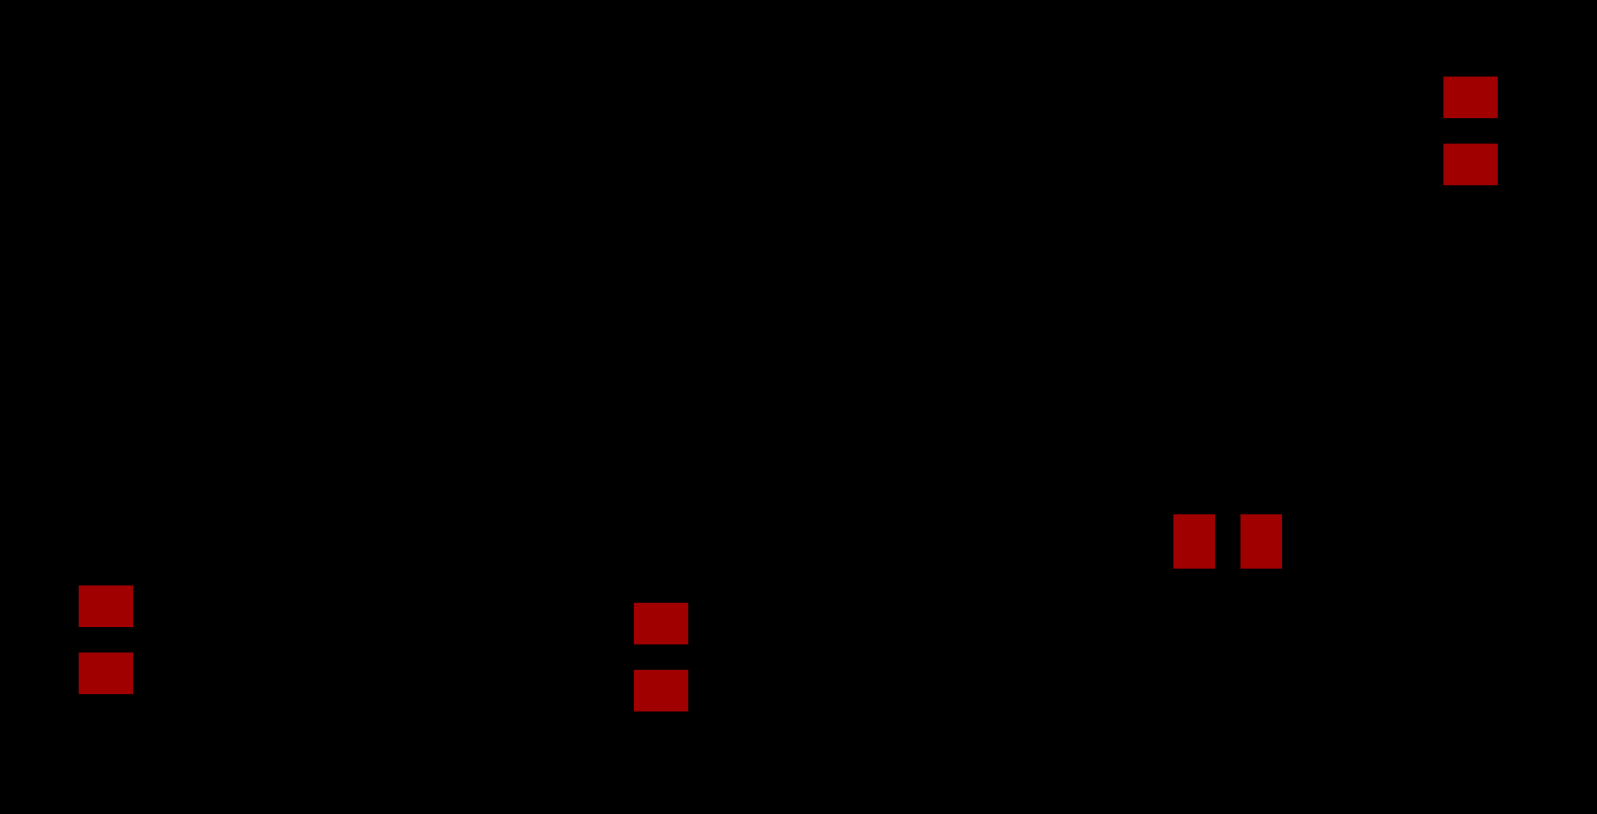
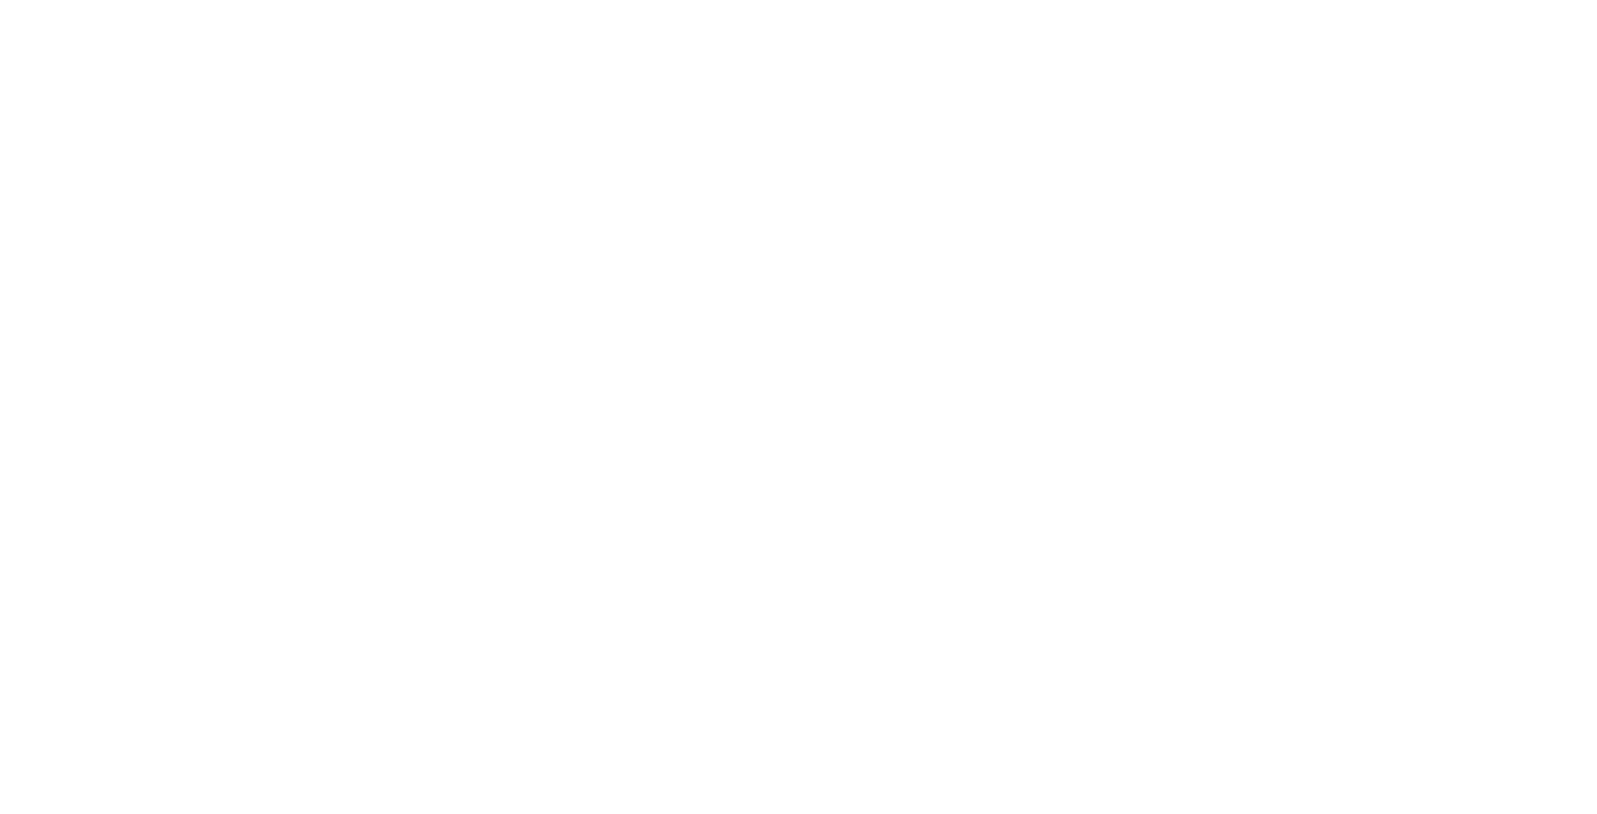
part: (1470, 130) -> none
part: (1227, 541) -> none
part: (105, 639) -> none
part: (661, 657) -> none

